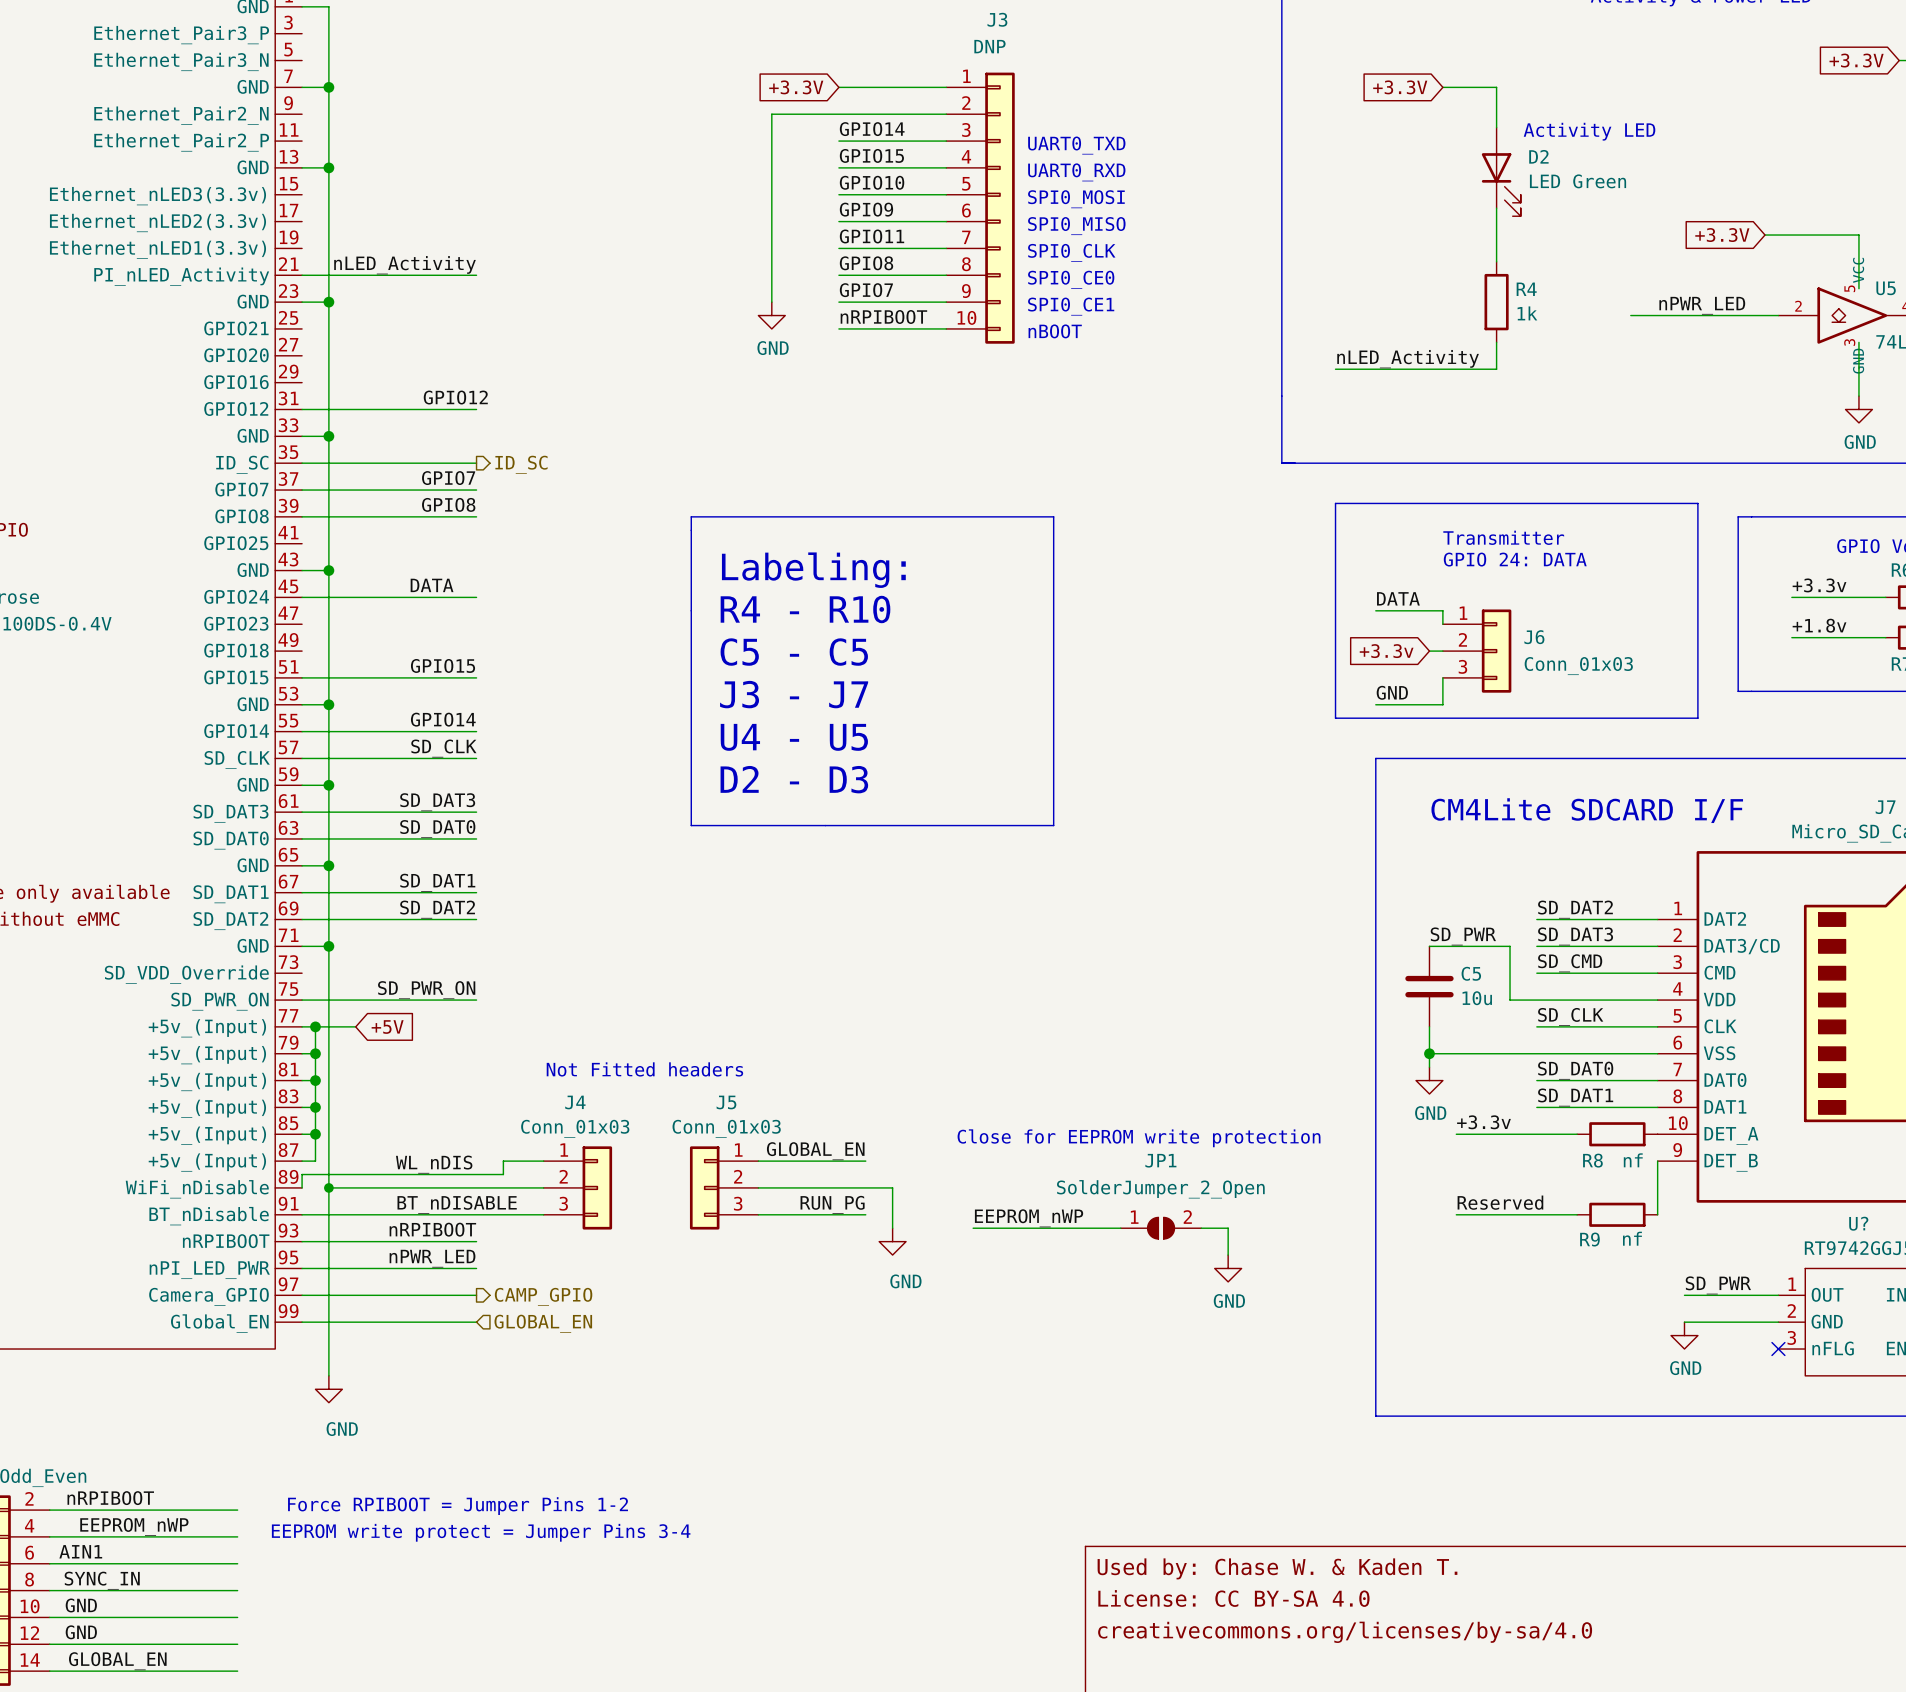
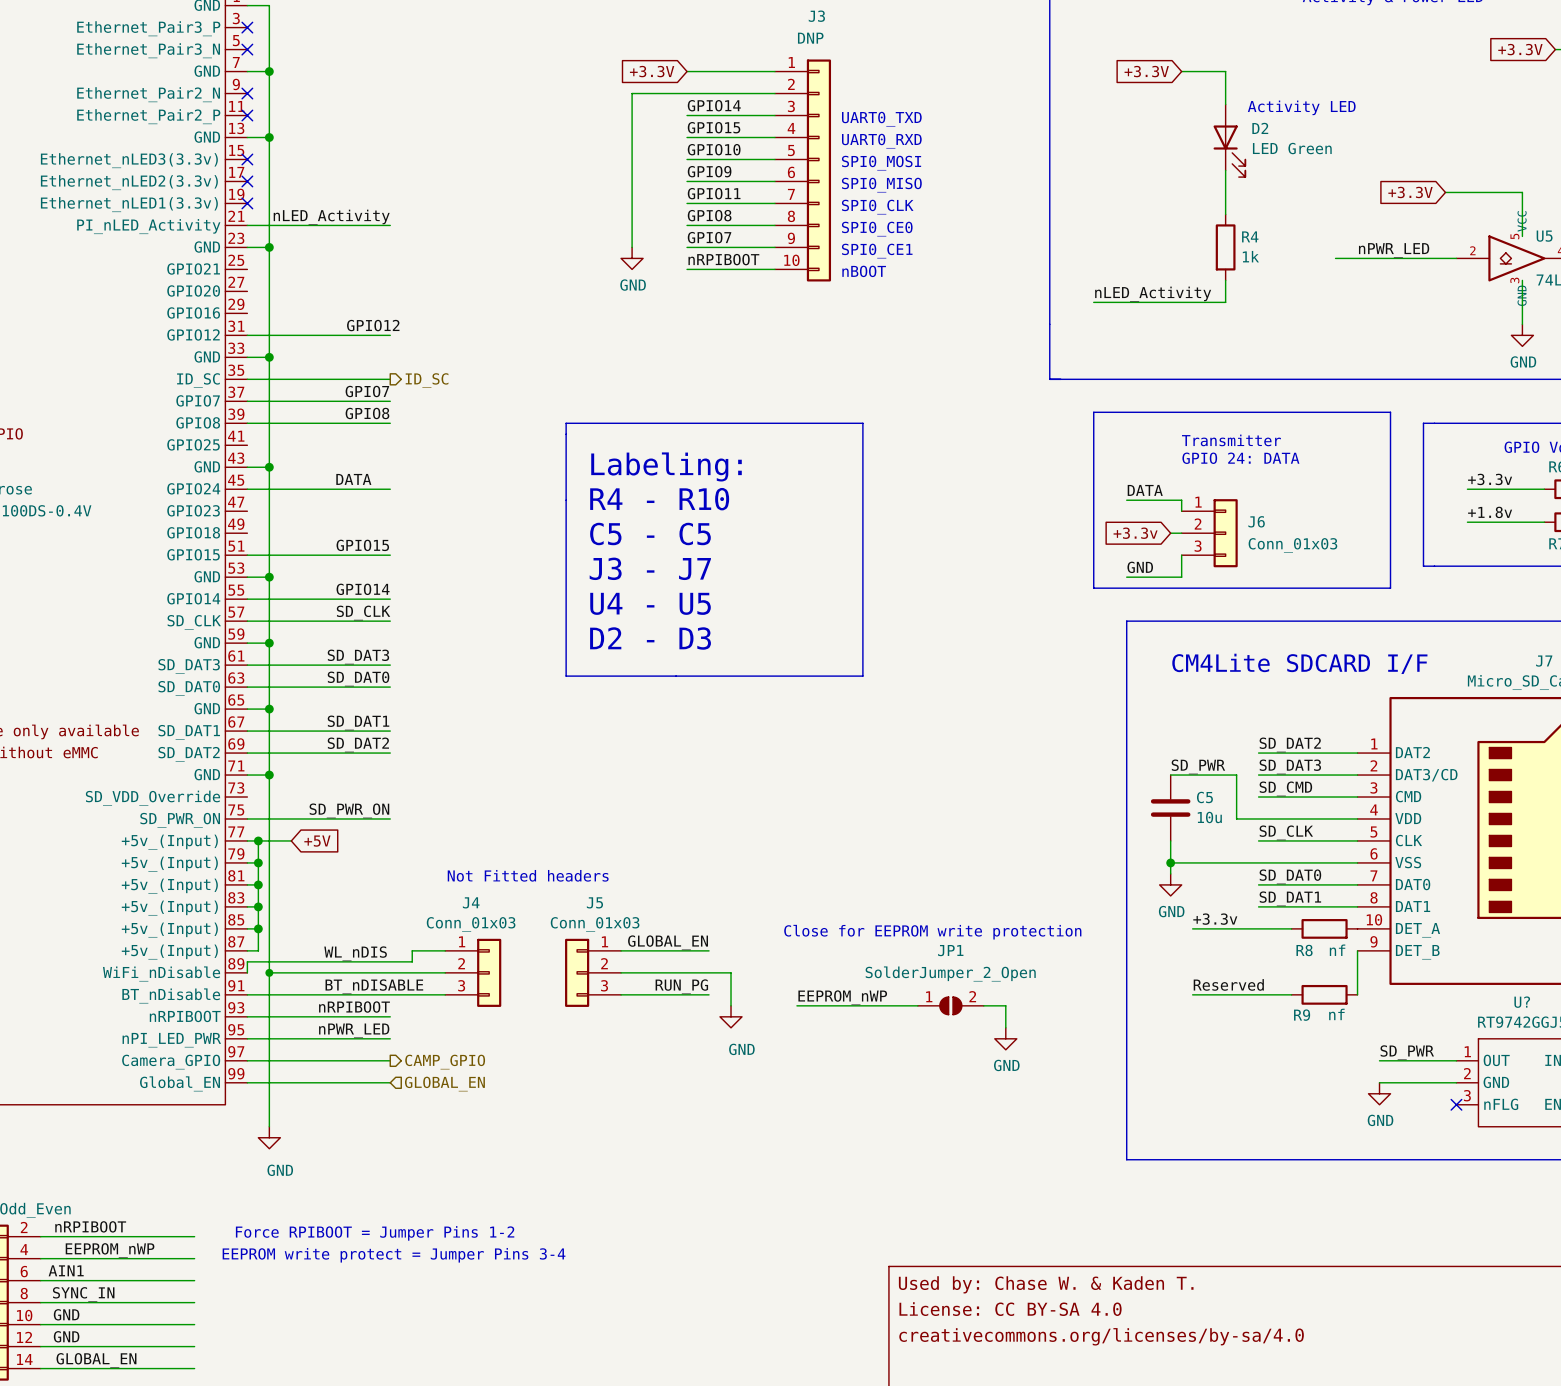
no-connect mark: none -> (247, 27)
no-connect mark: none -> (247, 49)
no-connect mark: none -> (247, 93)
no-connect mark: none -> (247, 115)
no-connect mark: none -> (247, 159)
no-connect mark: none -> (247, 181)
no-connect mark: none -> (247, 203)

